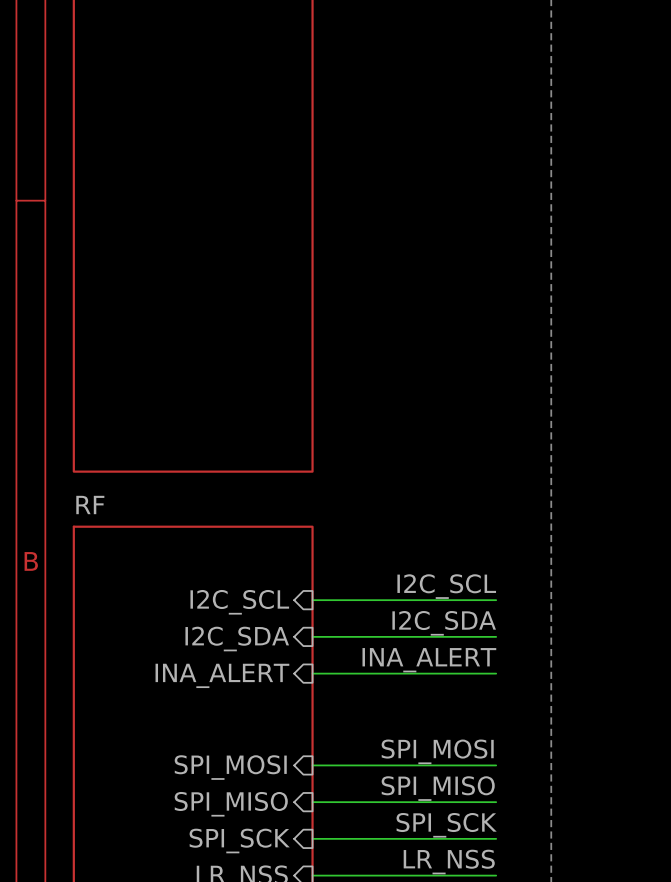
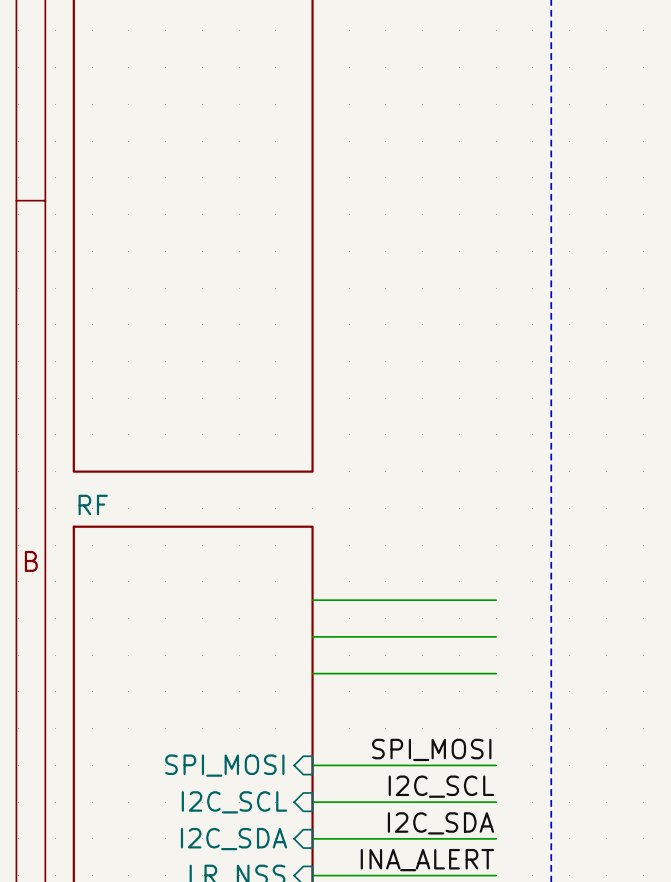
label: I2C_SCL (446, 586) -> none
sheet pin: I2C_SCL (239, 602) -> none
label: I2C_SDA (444, 623) -> none
sheet pin: I2C_SDA (237, 639) -> none
label: INA_ALERT (429, 660) -> none
sheet pin: INA_ALERT (222, 675) -> none
label: SPI_MISO (438, 788) -> I2C_SCL (441, 786)
sheet pin: SPI_MISO (231, 804) -> I2C_SCL (234, 802)
label: SPI_SCK (446, 825) -> I2C_SDA (440, 823)
sheet pin: SPI_SCK (239, 840) -> I2C_SDA (233, 839)
label: LR_NSS (449, 862) -> INA_ALERT (427, 860)

